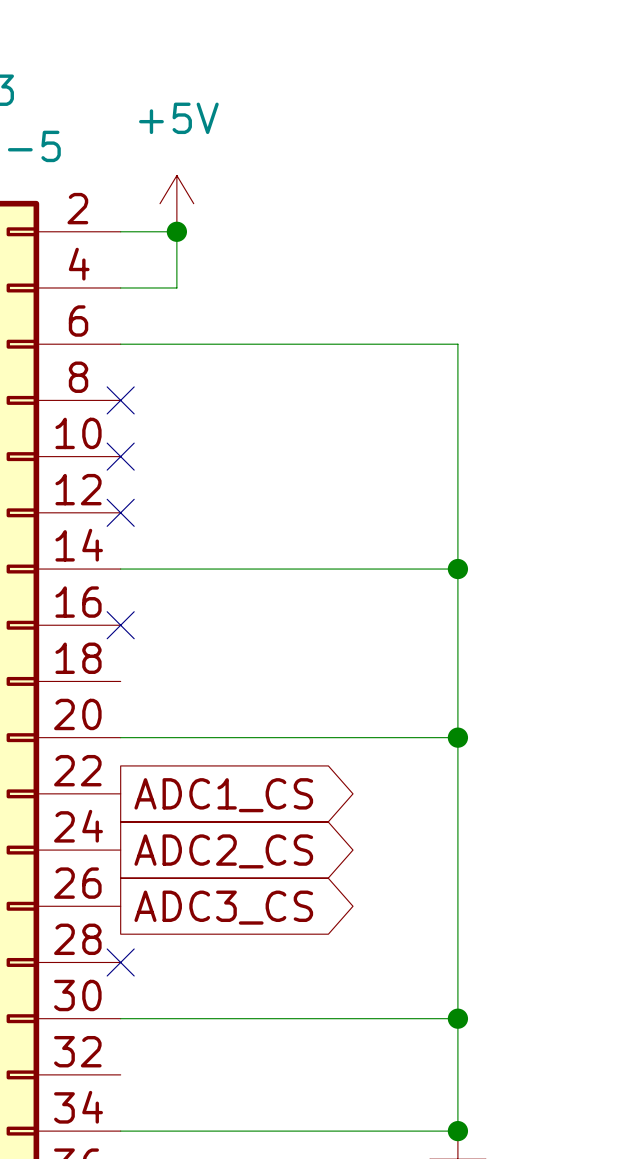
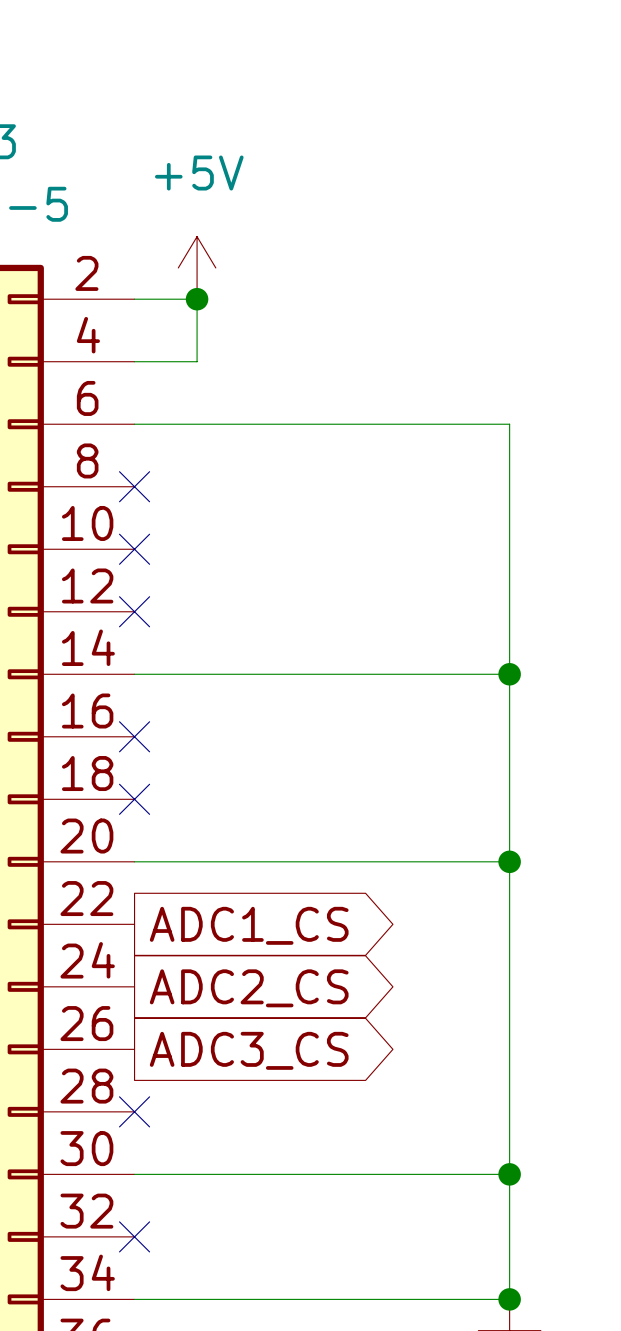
no-connect mark: none -> (134, 799)
no-connect mark: none -> (134, 1236)

